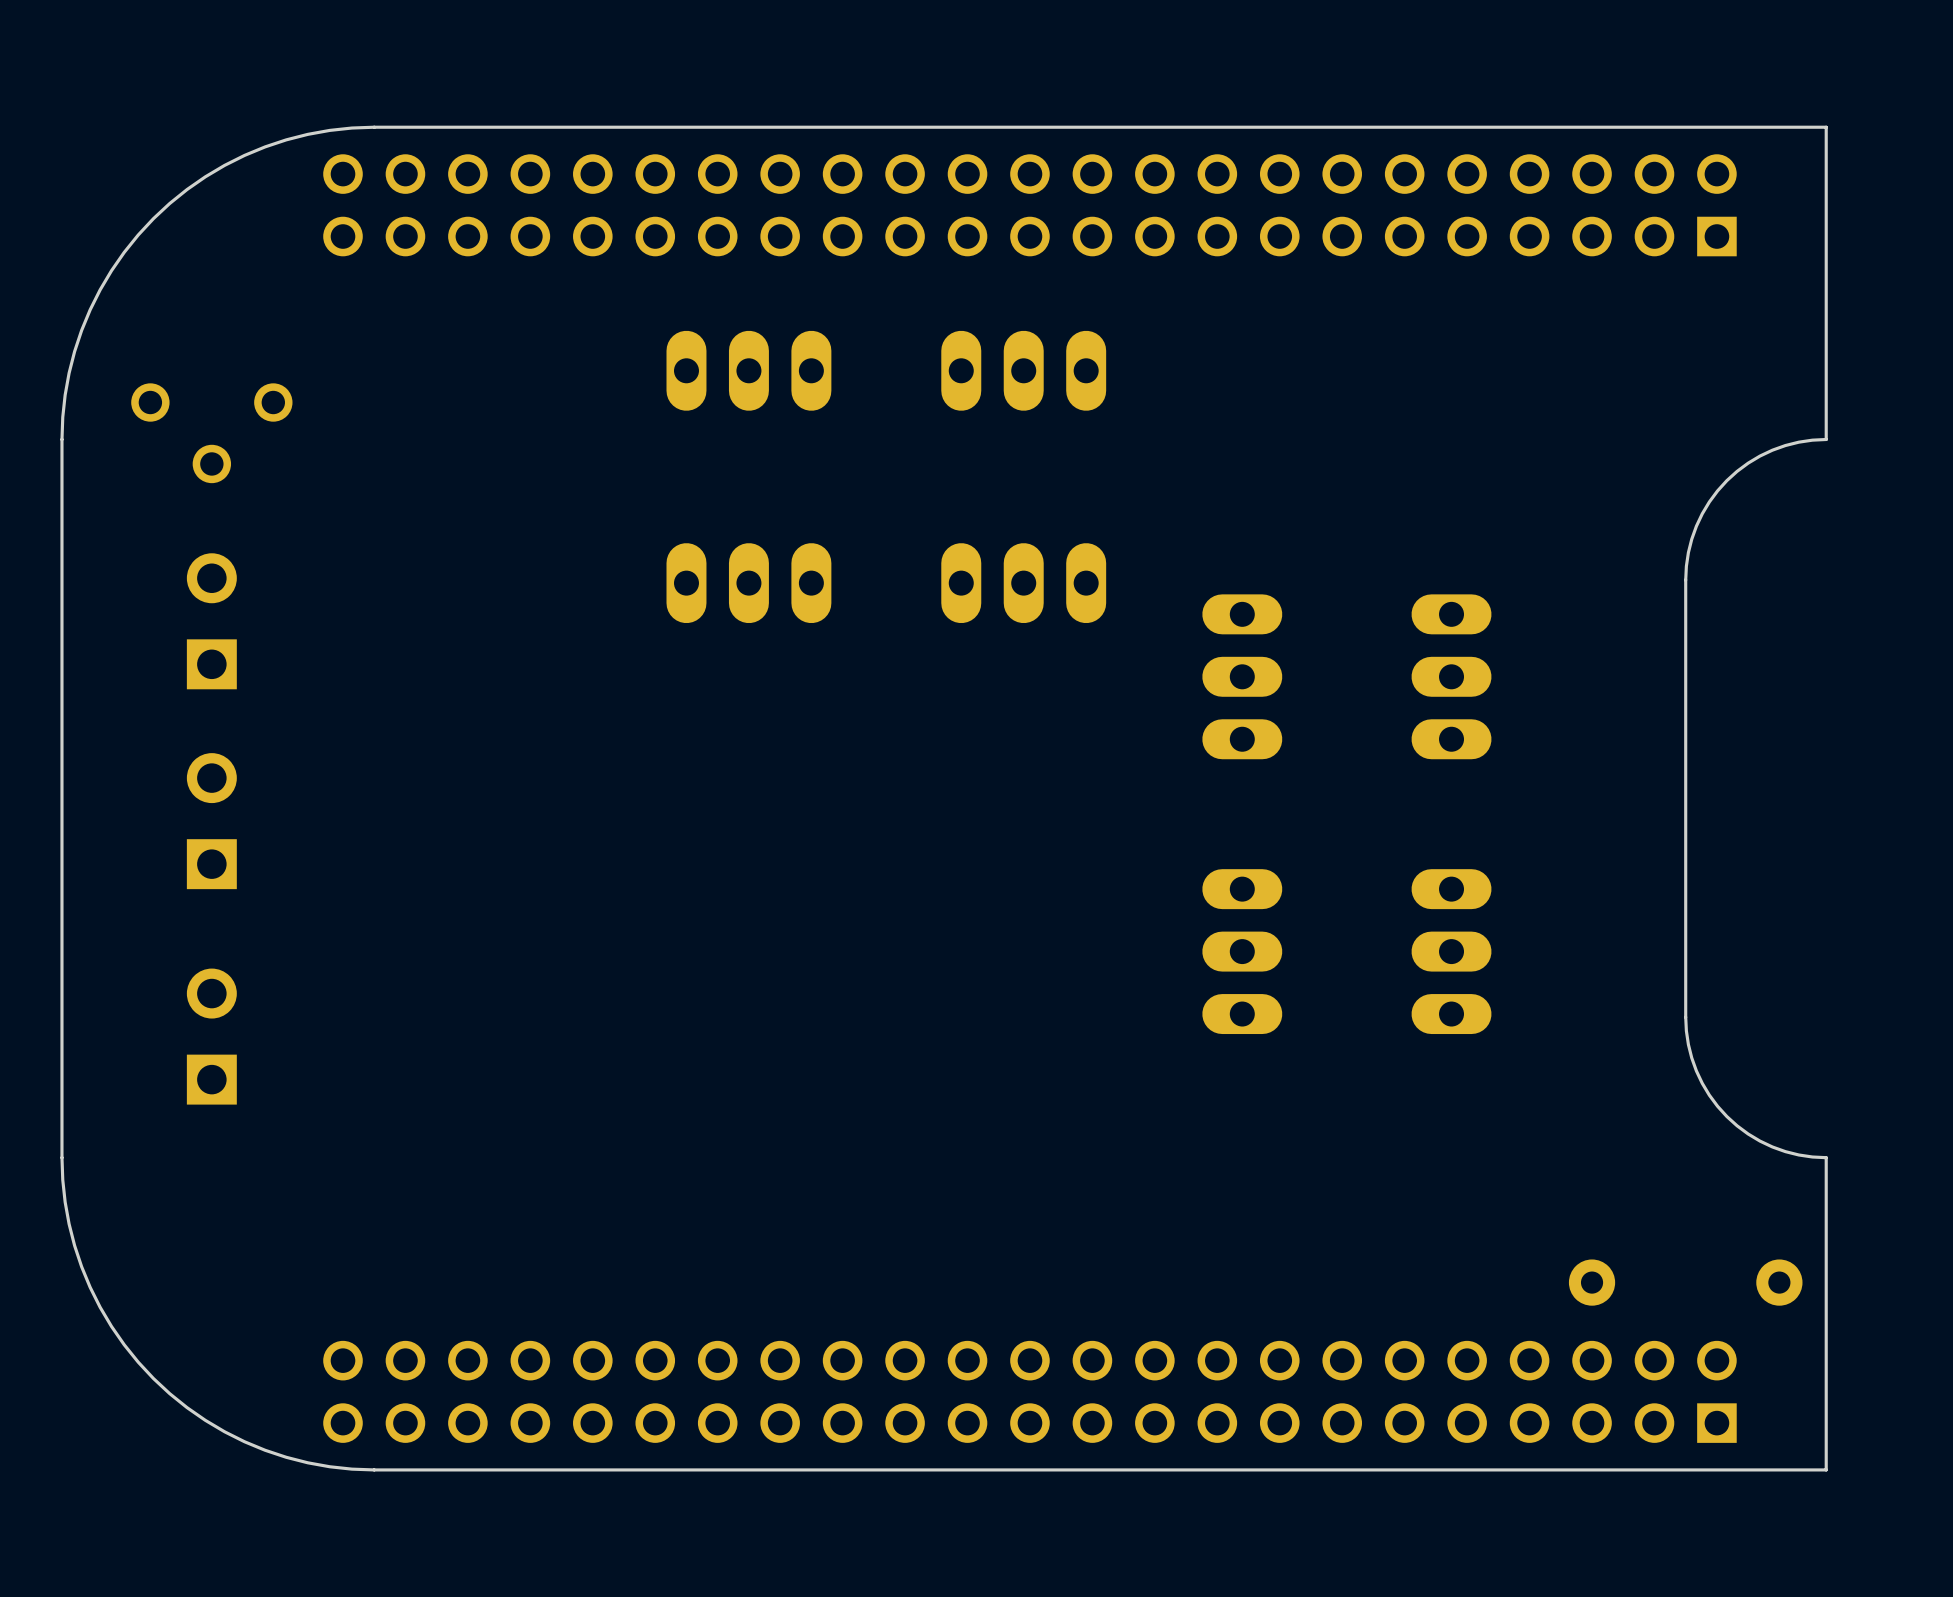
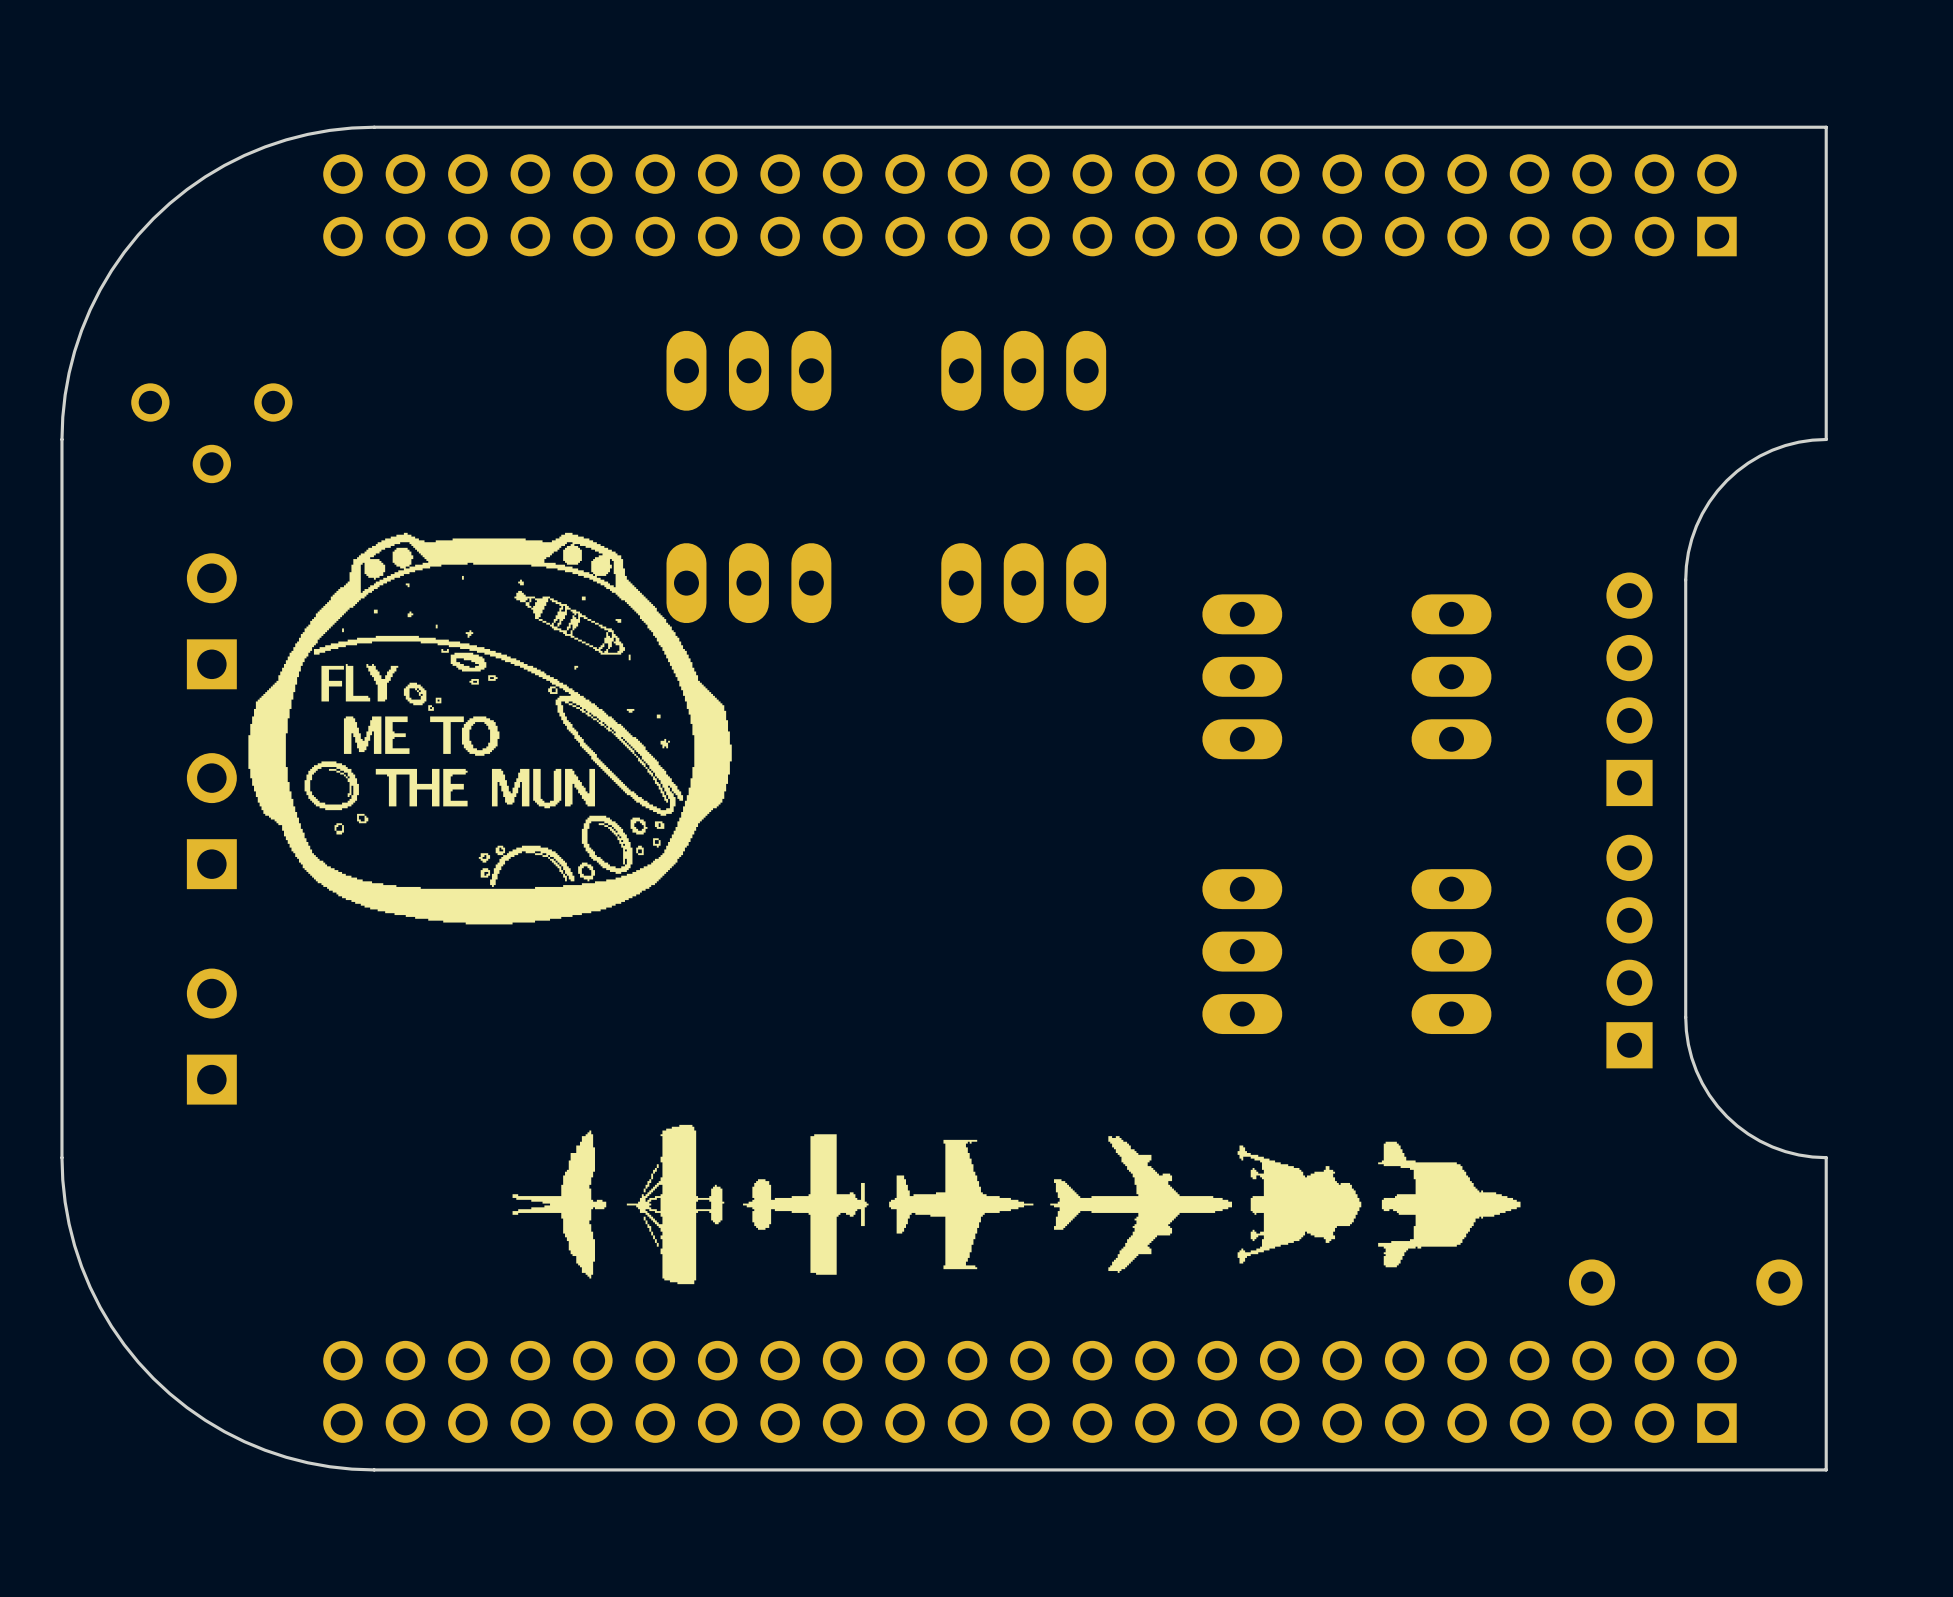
drawing: none -> [248, 532, 732, 925]
part: none -> (1629, 689)
part: none -> (1629, 951)
drawing: none -> [512, 1124, 1521, 1285]

